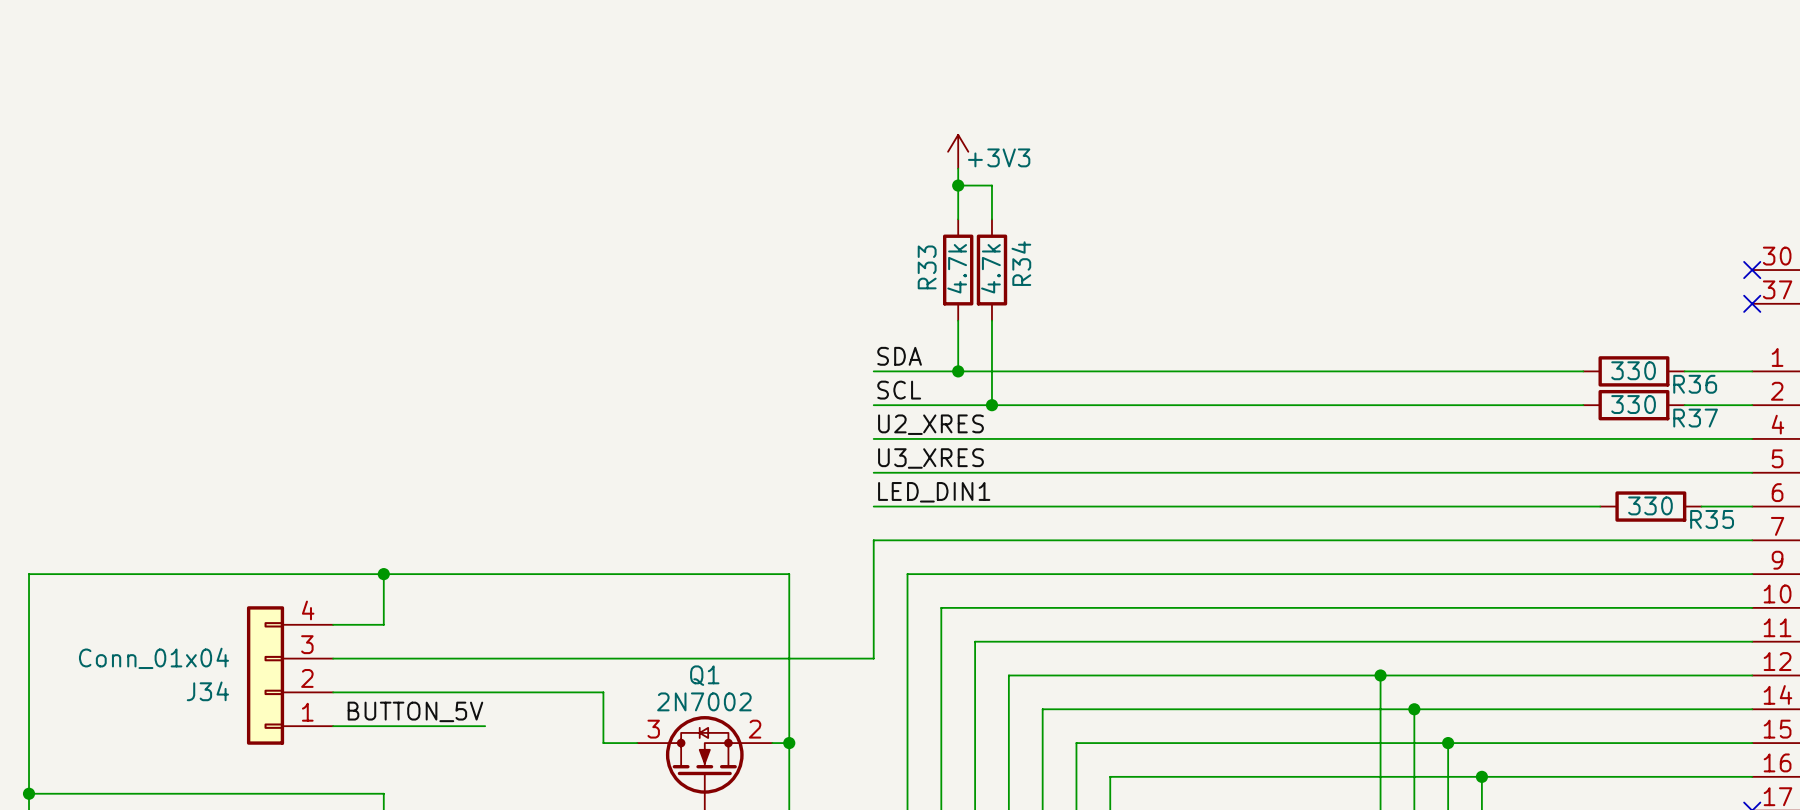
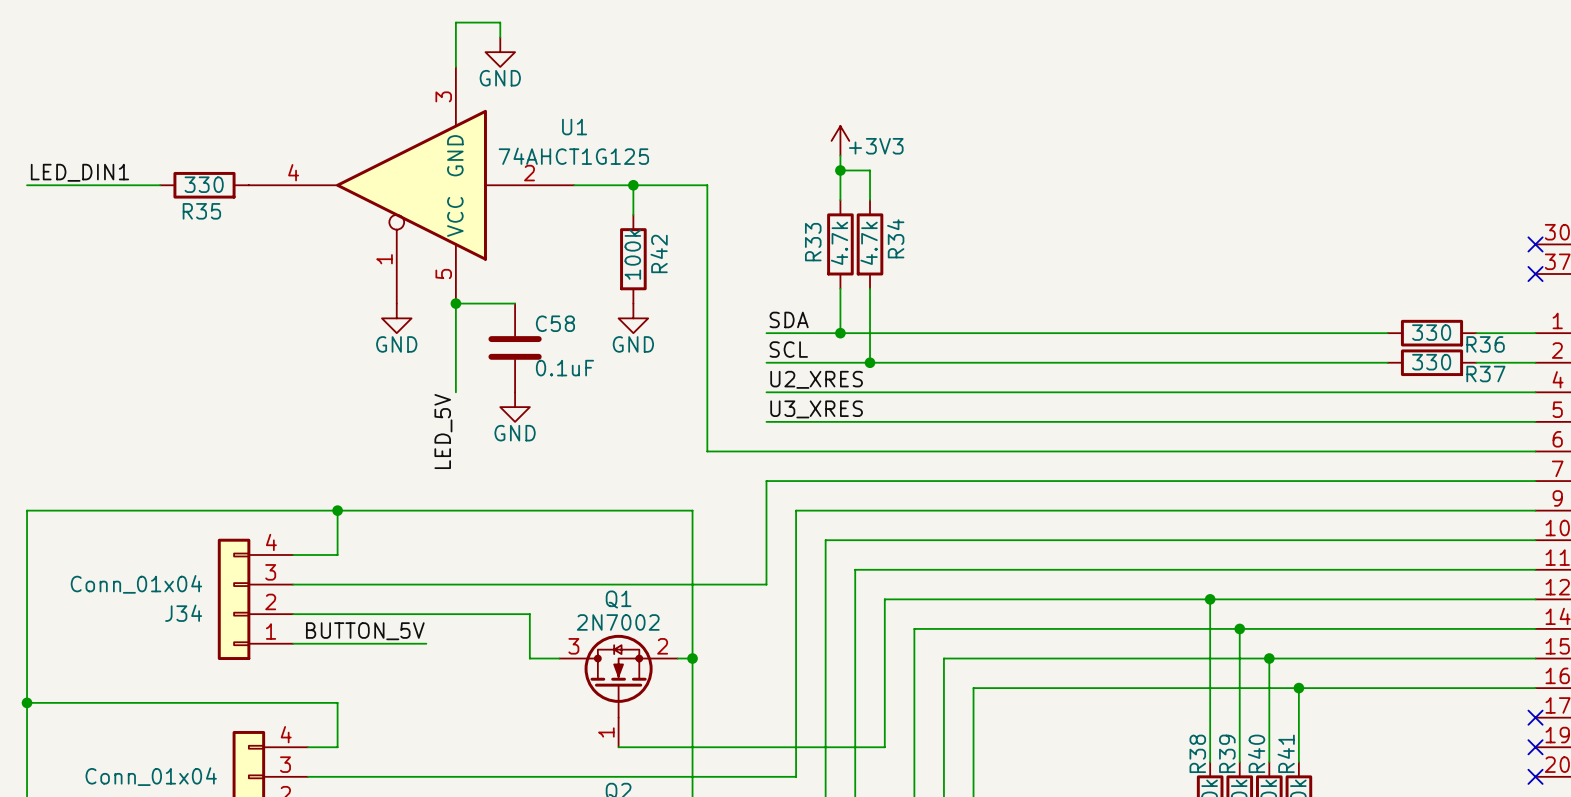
wire: none -> (500, 37) (500, 22) (455, 22) (455, 66)
power symbol: none -> GND (500, 52)
label: none -> LED_DIN1 (79, 172)
wire: none -> (27, 185) (160, 185)
U1: none -> 74AHCT1G125 (411, 185)
wire: none -> (574, 185) (707, 185) (707, 451) (766, 451)
wire: none -> (633, 185) (633, 214)
junction: none -> (633, 185)
R42: none -> 100k (633, 259)
junction: none -> (455, 303)
wire: none -> (515, 303) (455, 303) (455, 392)
power symbol: none -> GND (396, 318)
power symbol: none -> GND (633, 318)
C58: none -> 0.1uF (515, 347)
power symbol: none -> GND (515, 407)
label: none -> LED_5V (443, 431)
label: LED_DIN1 (934, 492) -> none
wire: none -> (1402, 451) (1491, 451)
R35 position: (1650, 506) -> (204, 185)
R35 name position: R35 (1712, 519) -> R35 (201, 211)

